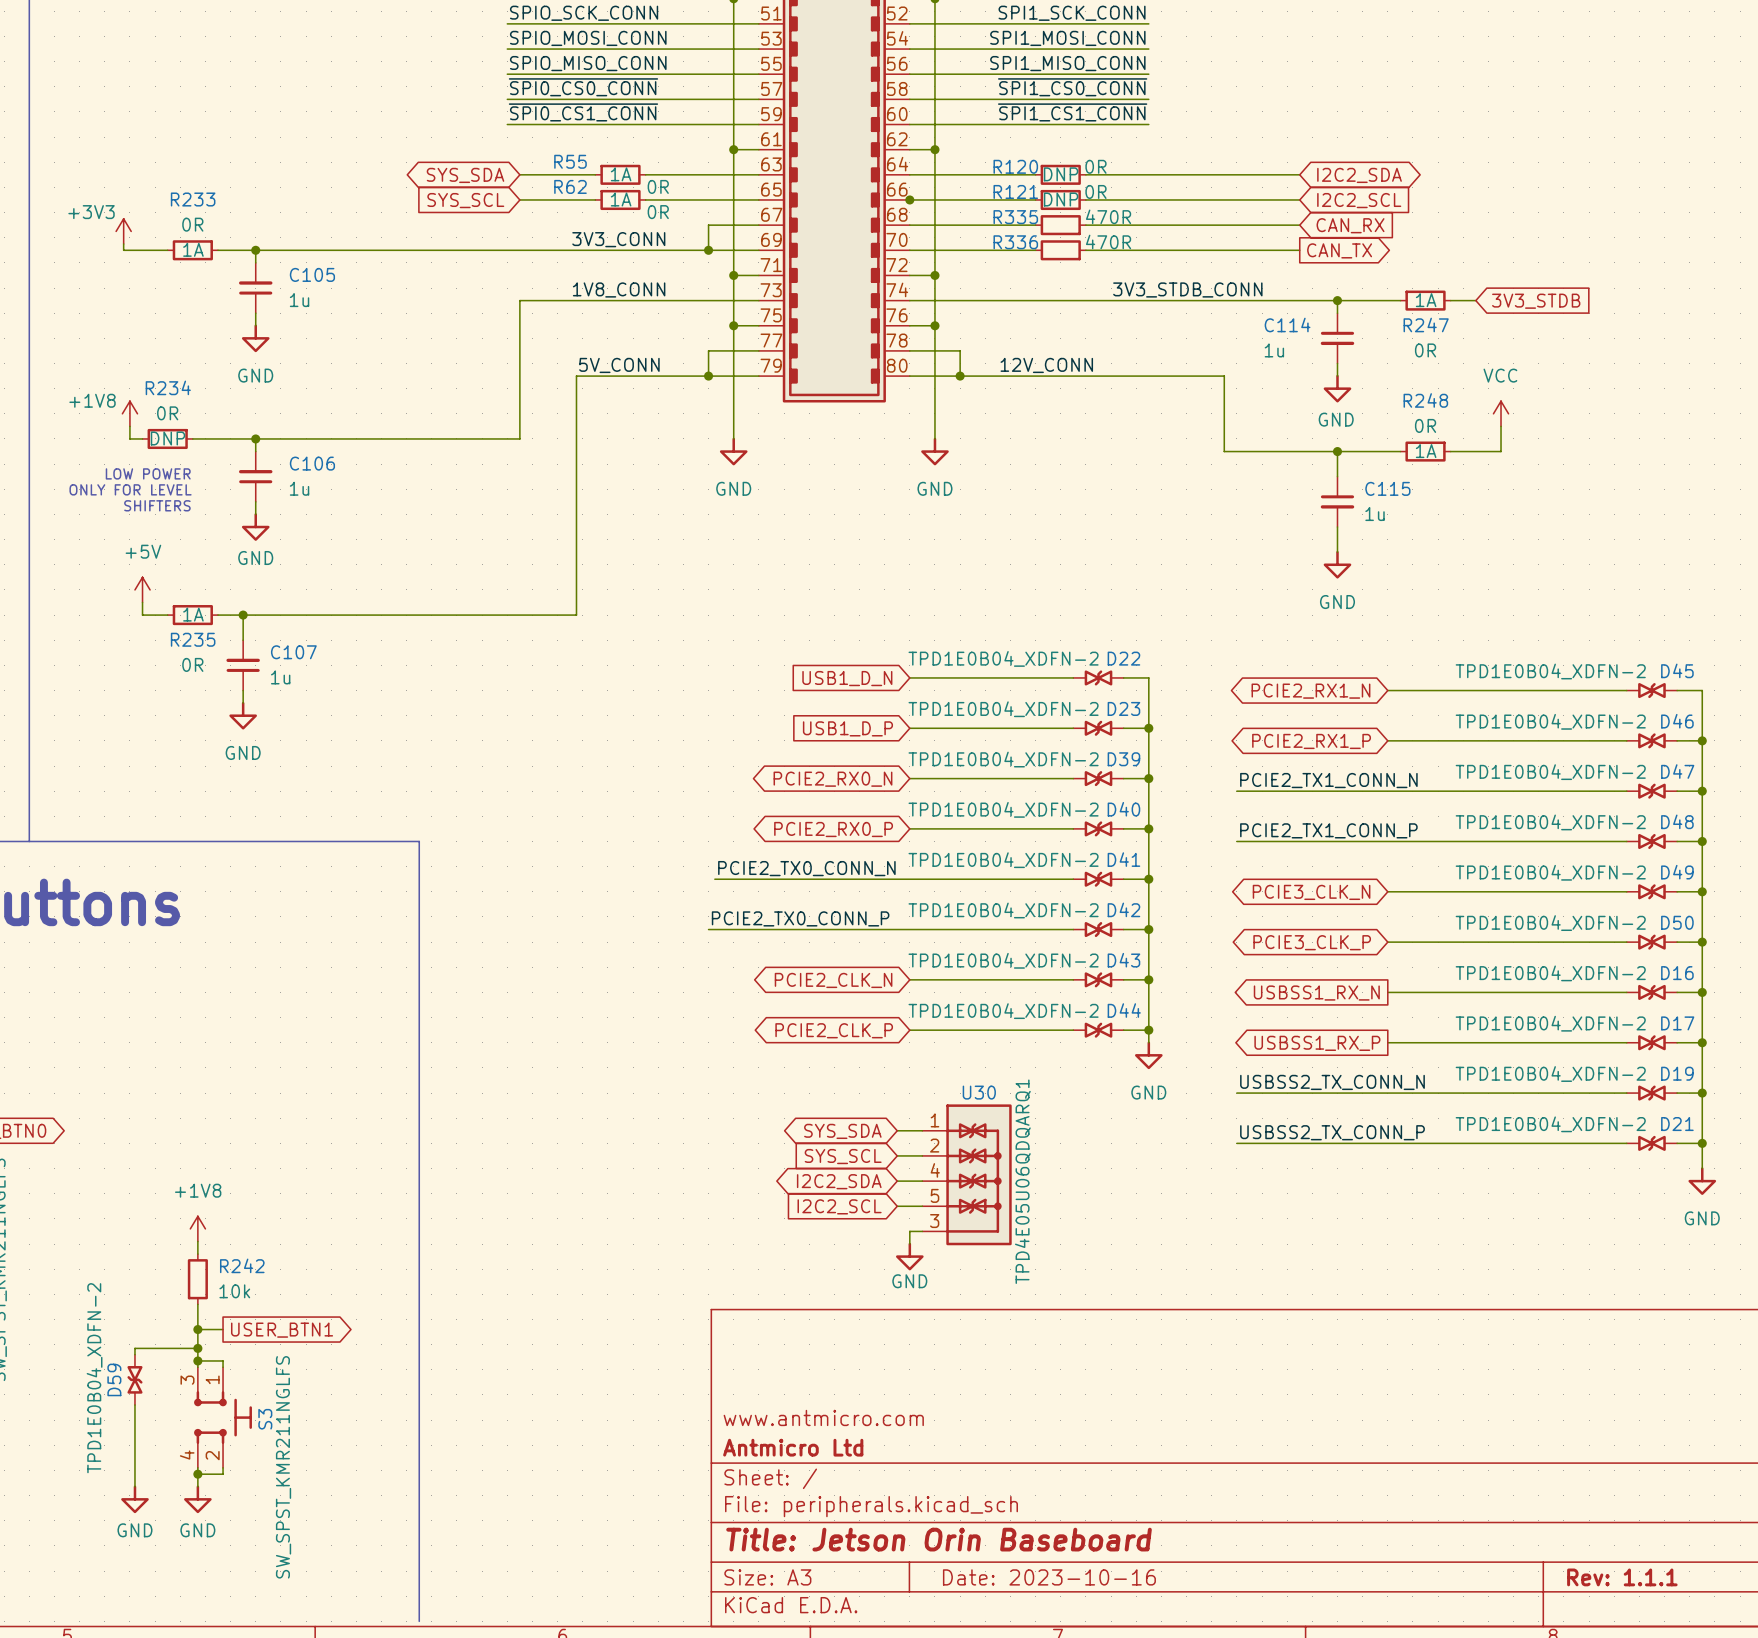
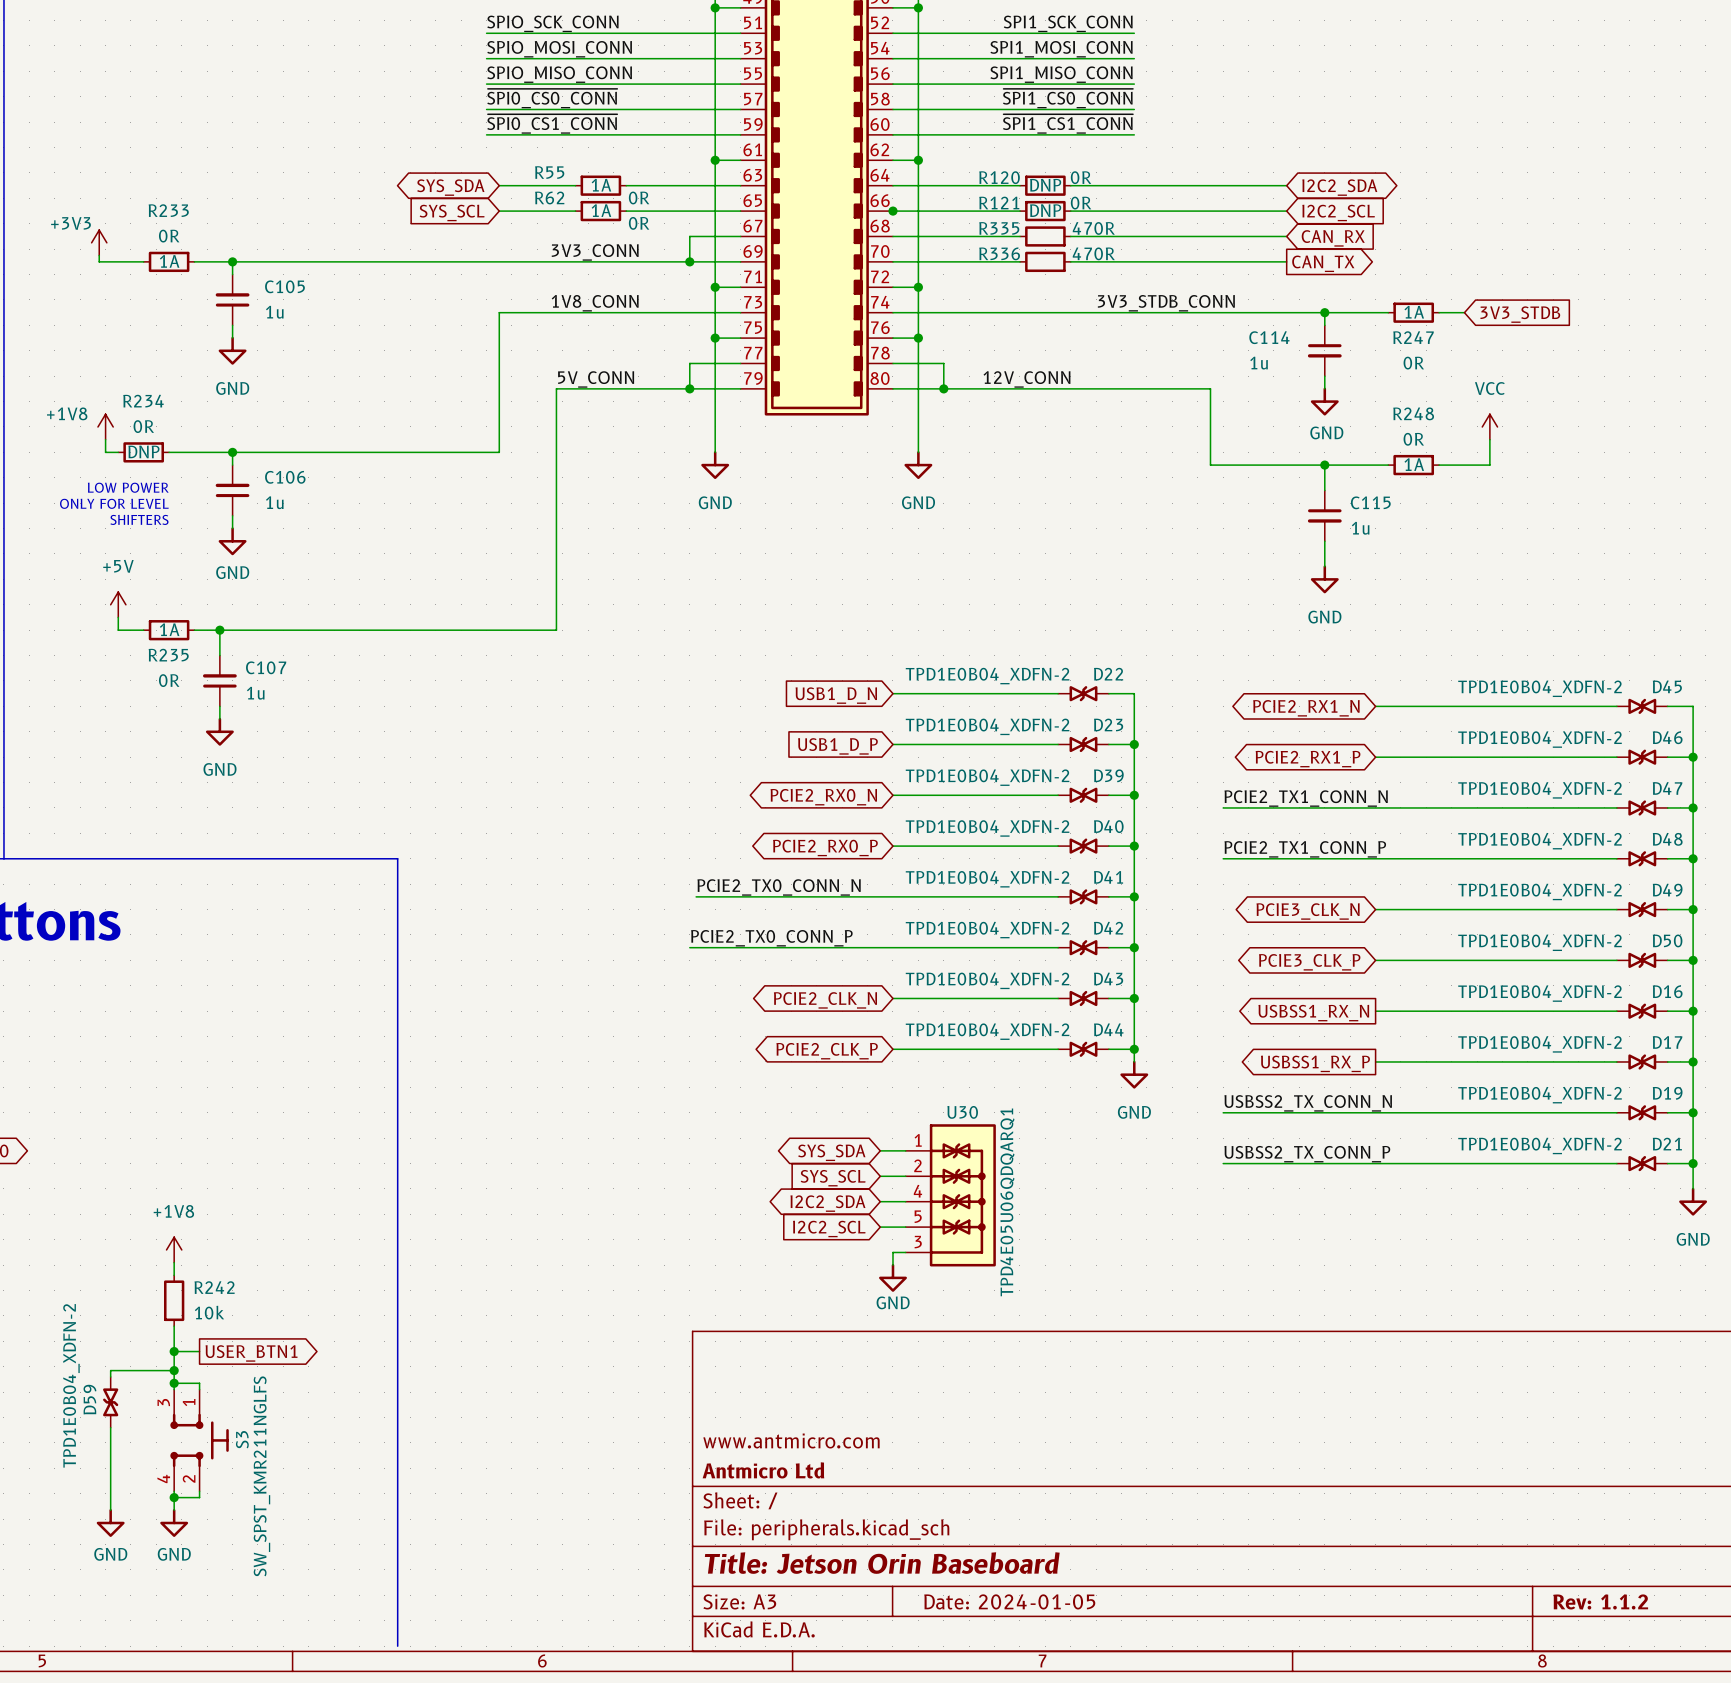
title block: Date: 2023-10-16 (1049, 1577) -> Date: 2024-01-05 (1009, 1601)
title block: Rev: 1.1.1 (1622, 1577) -> Rev: 1.1.2 (1600, 1601)

